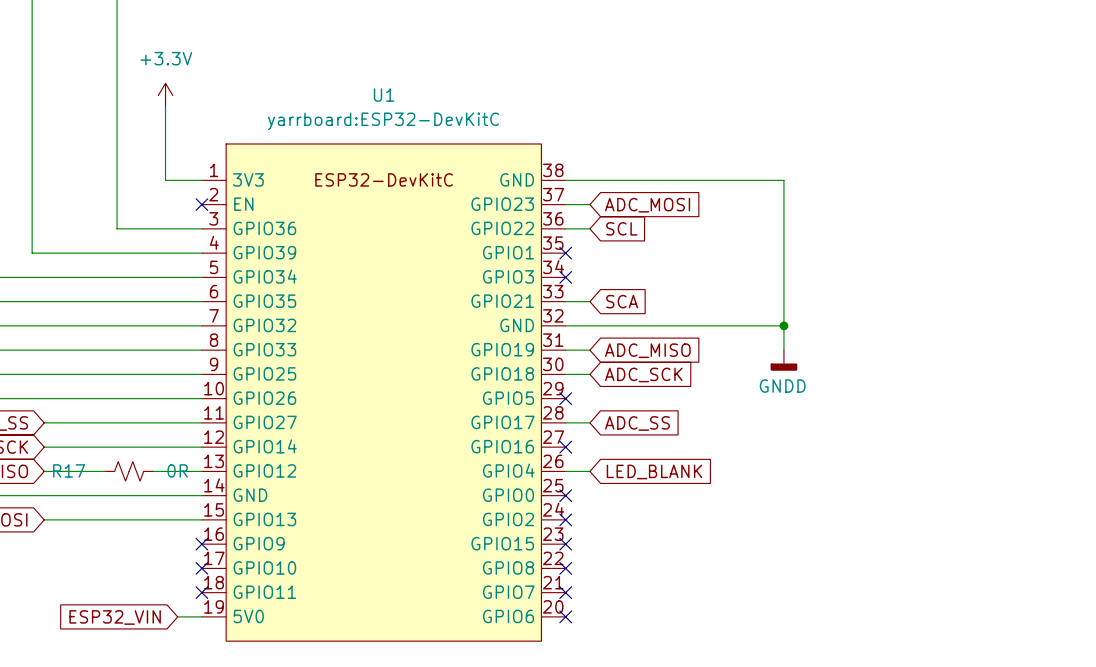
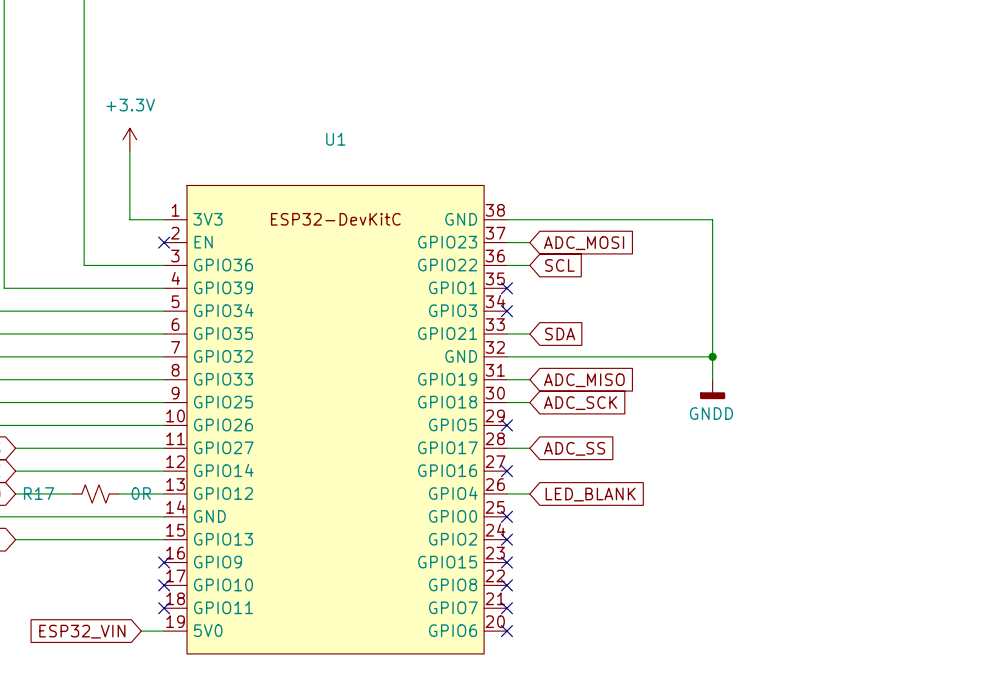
U1 text: yarrboard:ESP32-DevKitC (383, 121) -> none
global label: SCA (622, 301) -> SDA (560, 334)

